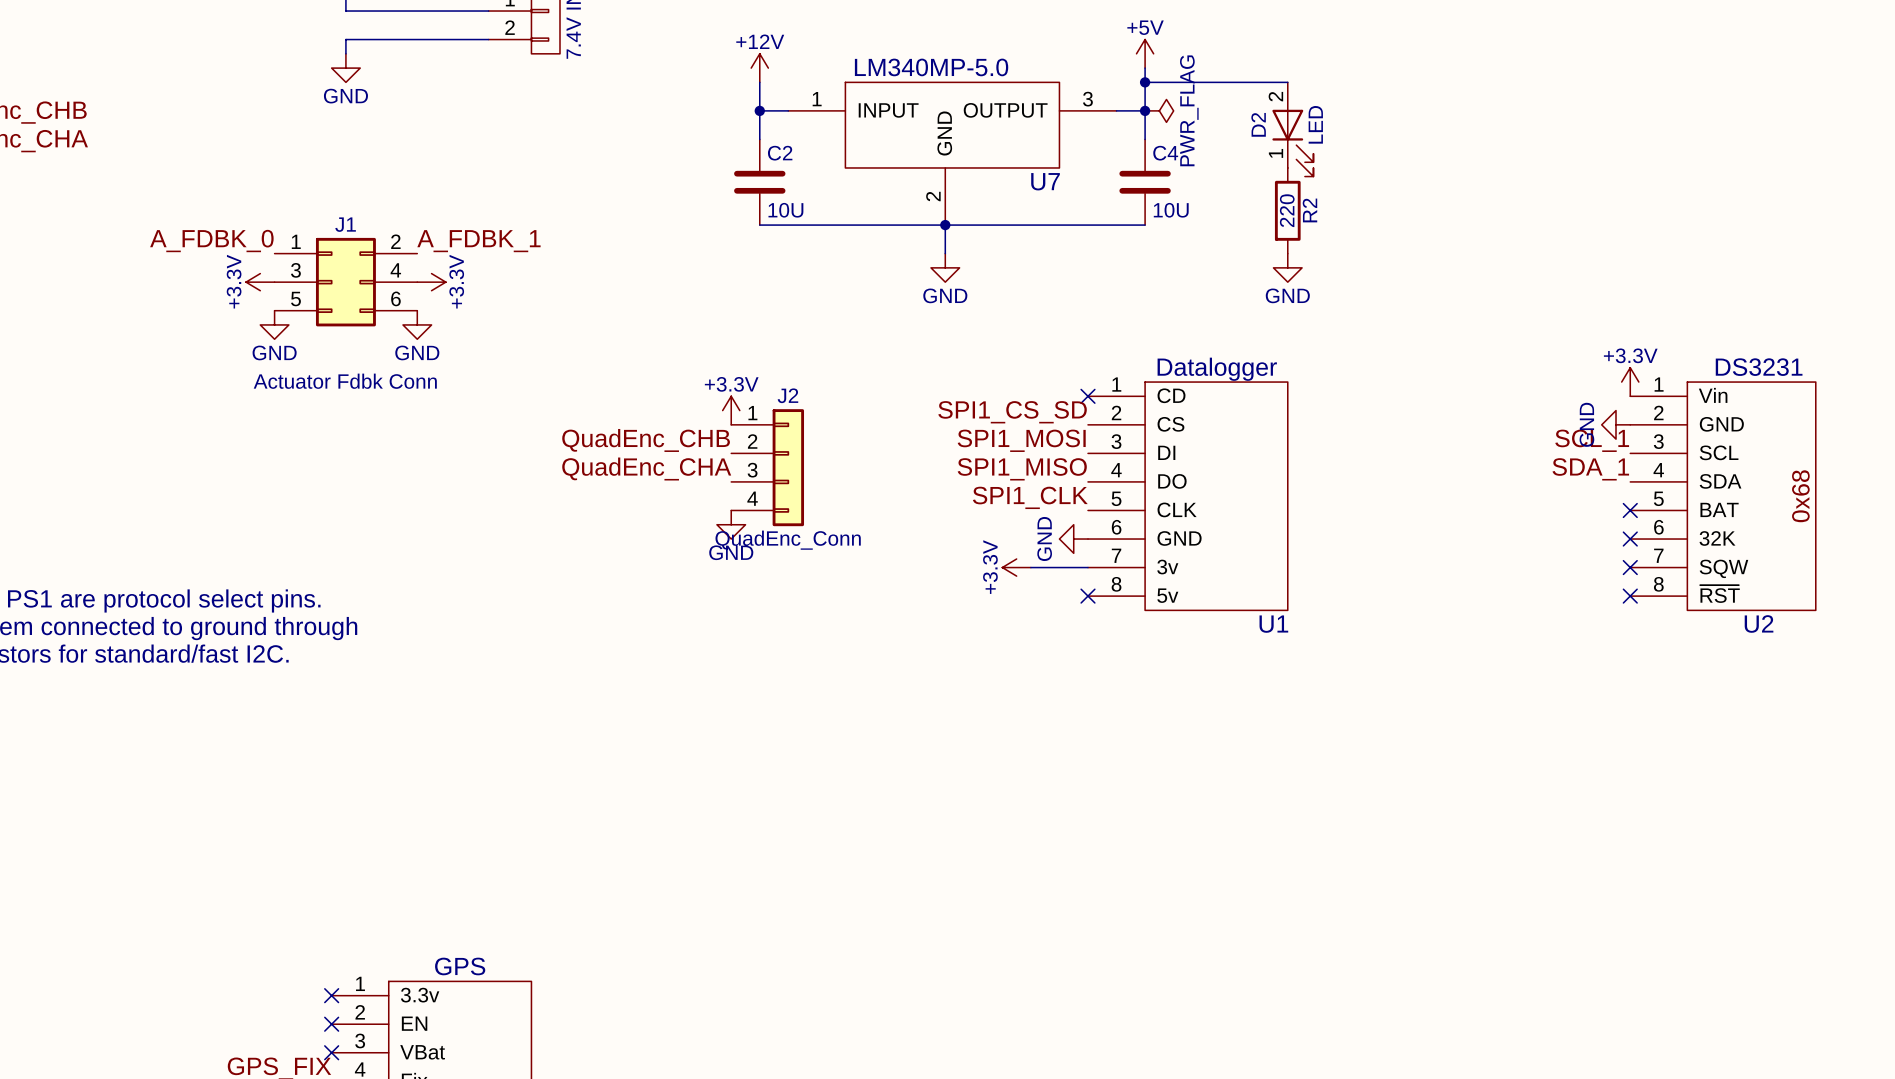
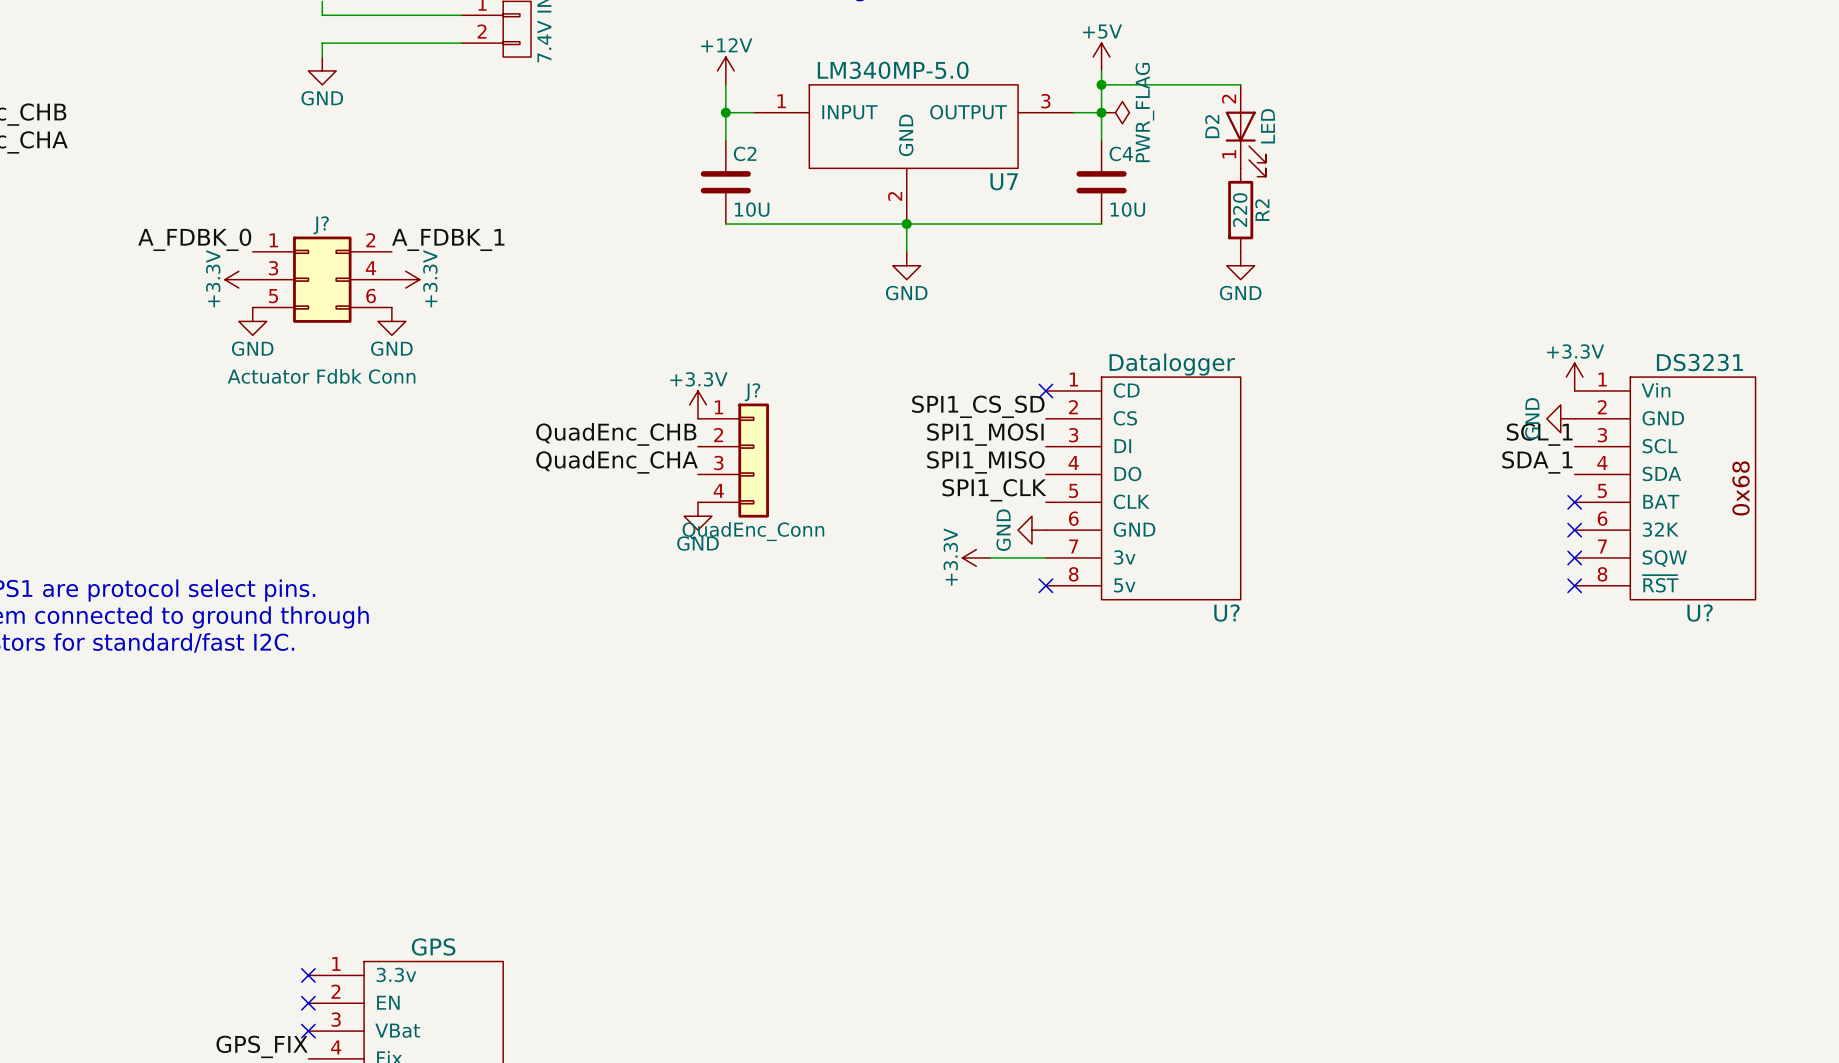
J1 name: J1 (345, 224) -> J? (321, 225)
J2 name: J2 (787, 395) -> J? (752, 392)
U2 name: U2 (1759, 623) -> U? (1700, 613)
U1 name: U1 (1273, 624) -> U? (1226, 613)

